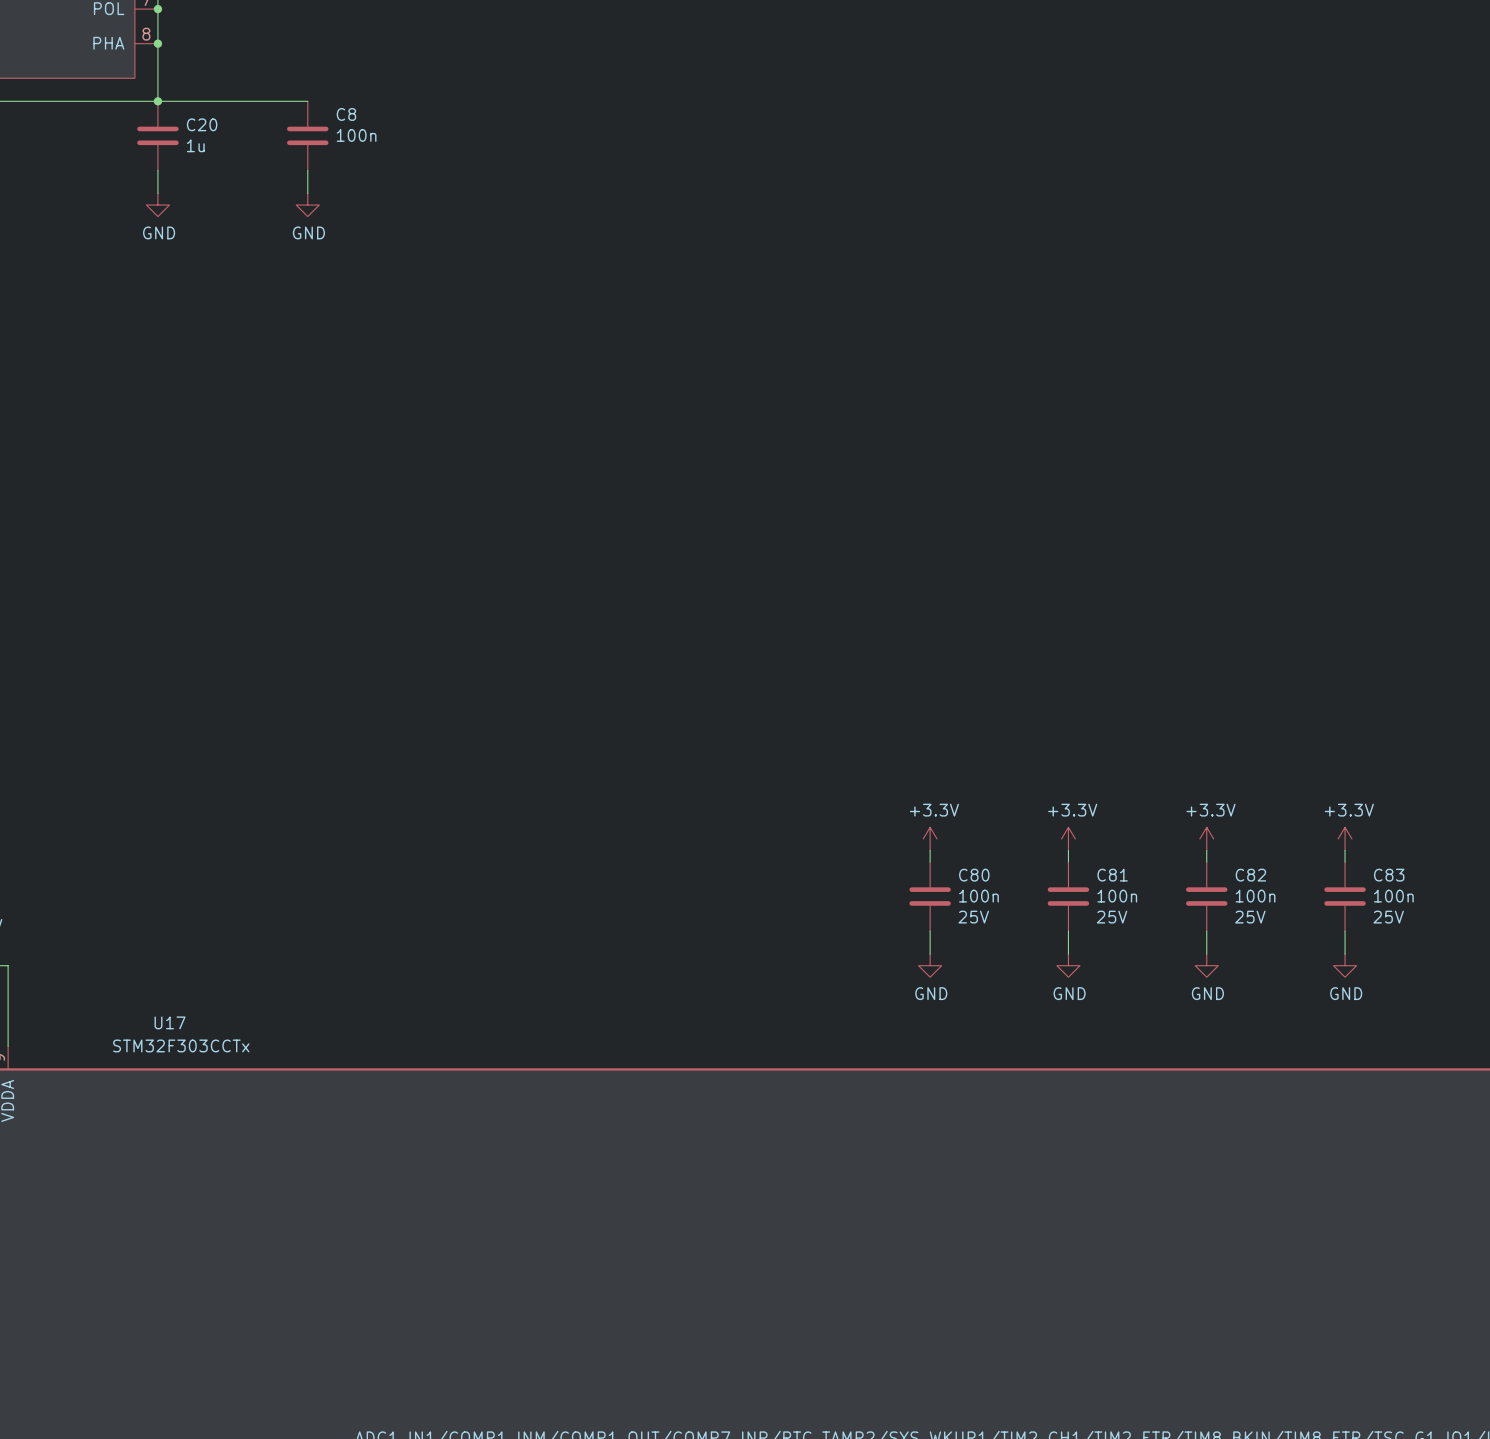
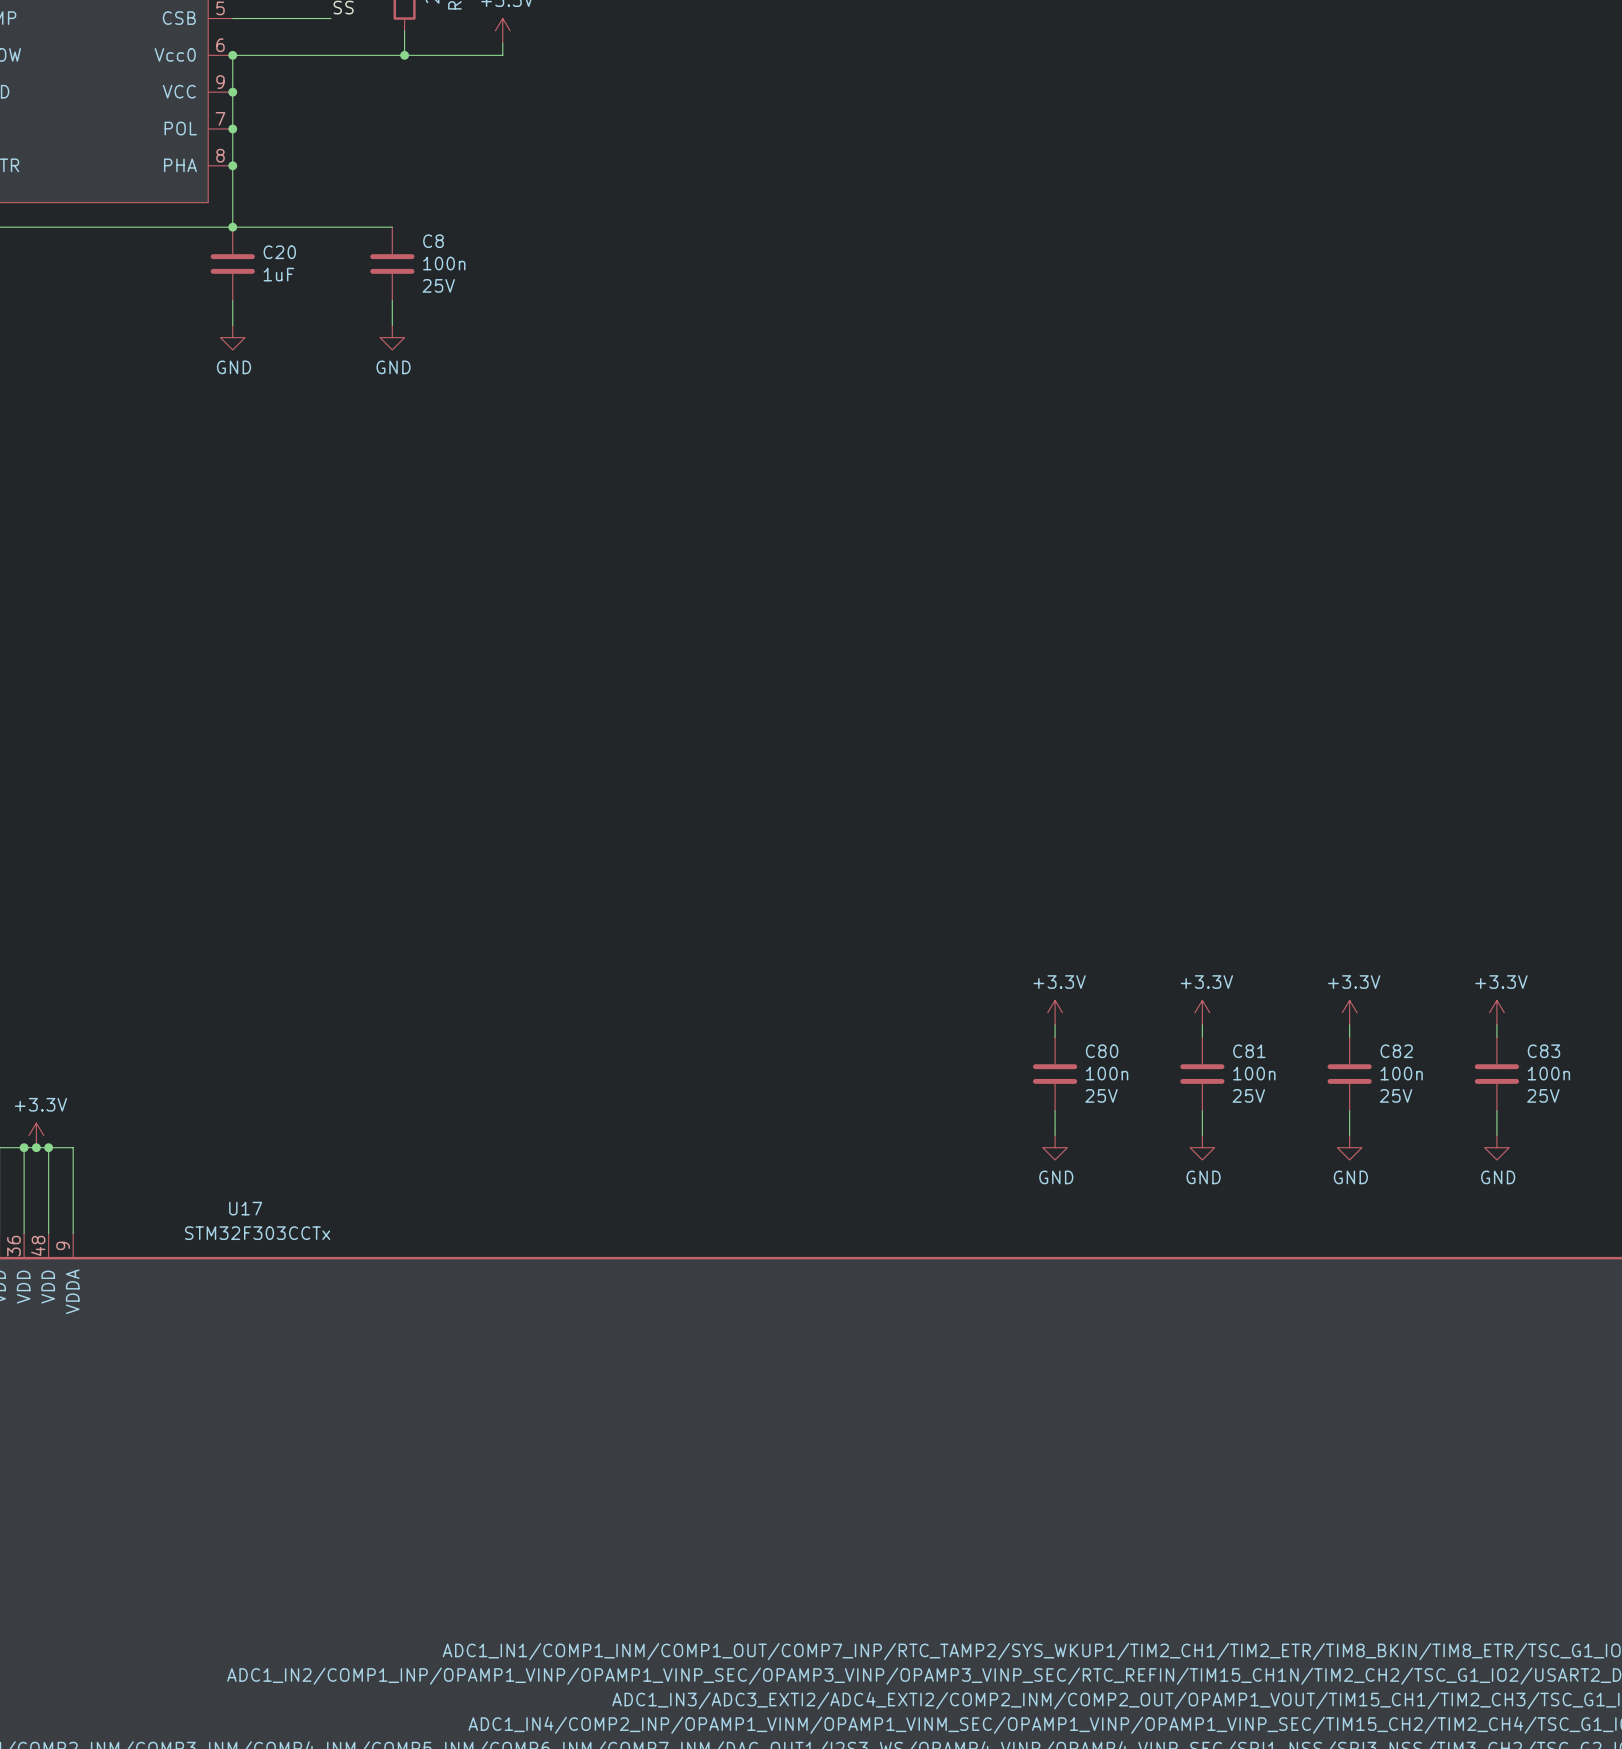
C20 value: 1u (195, 145) -> 1uF (278, 274)
C8 text: none -> 25V (438, 285)

